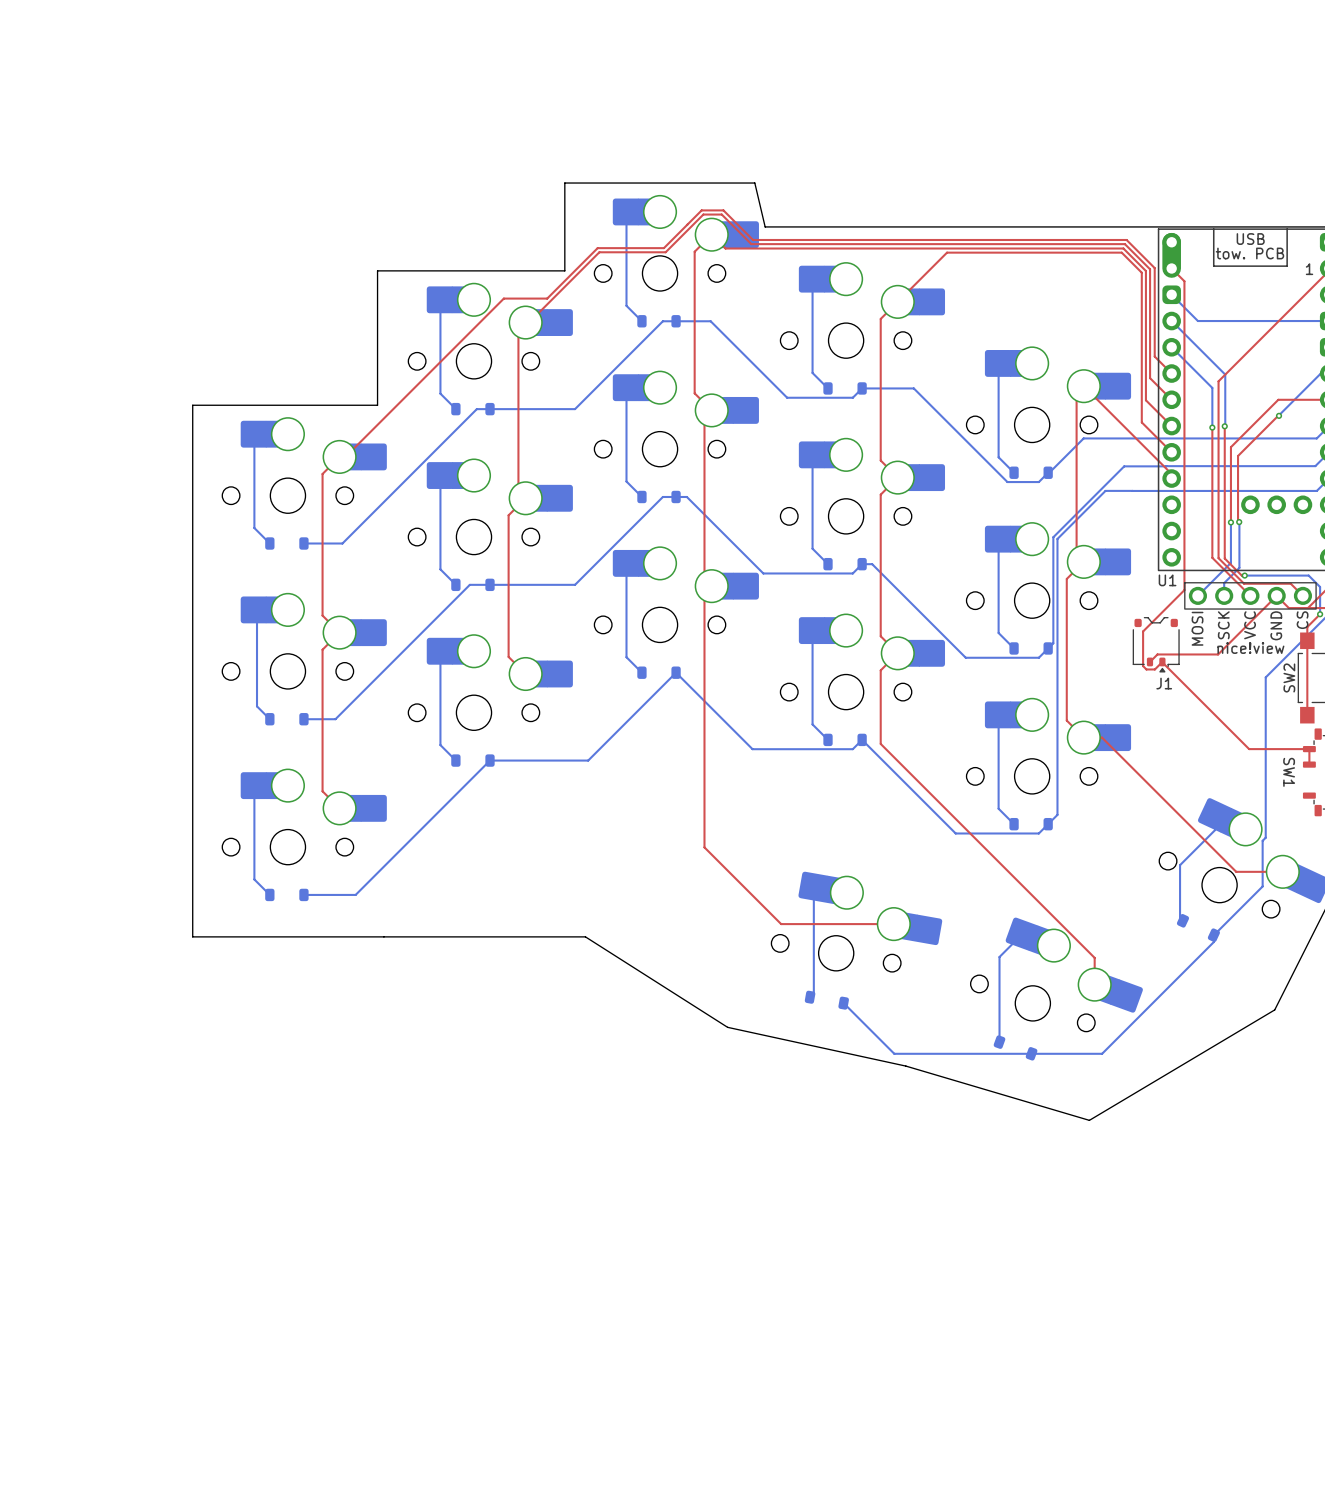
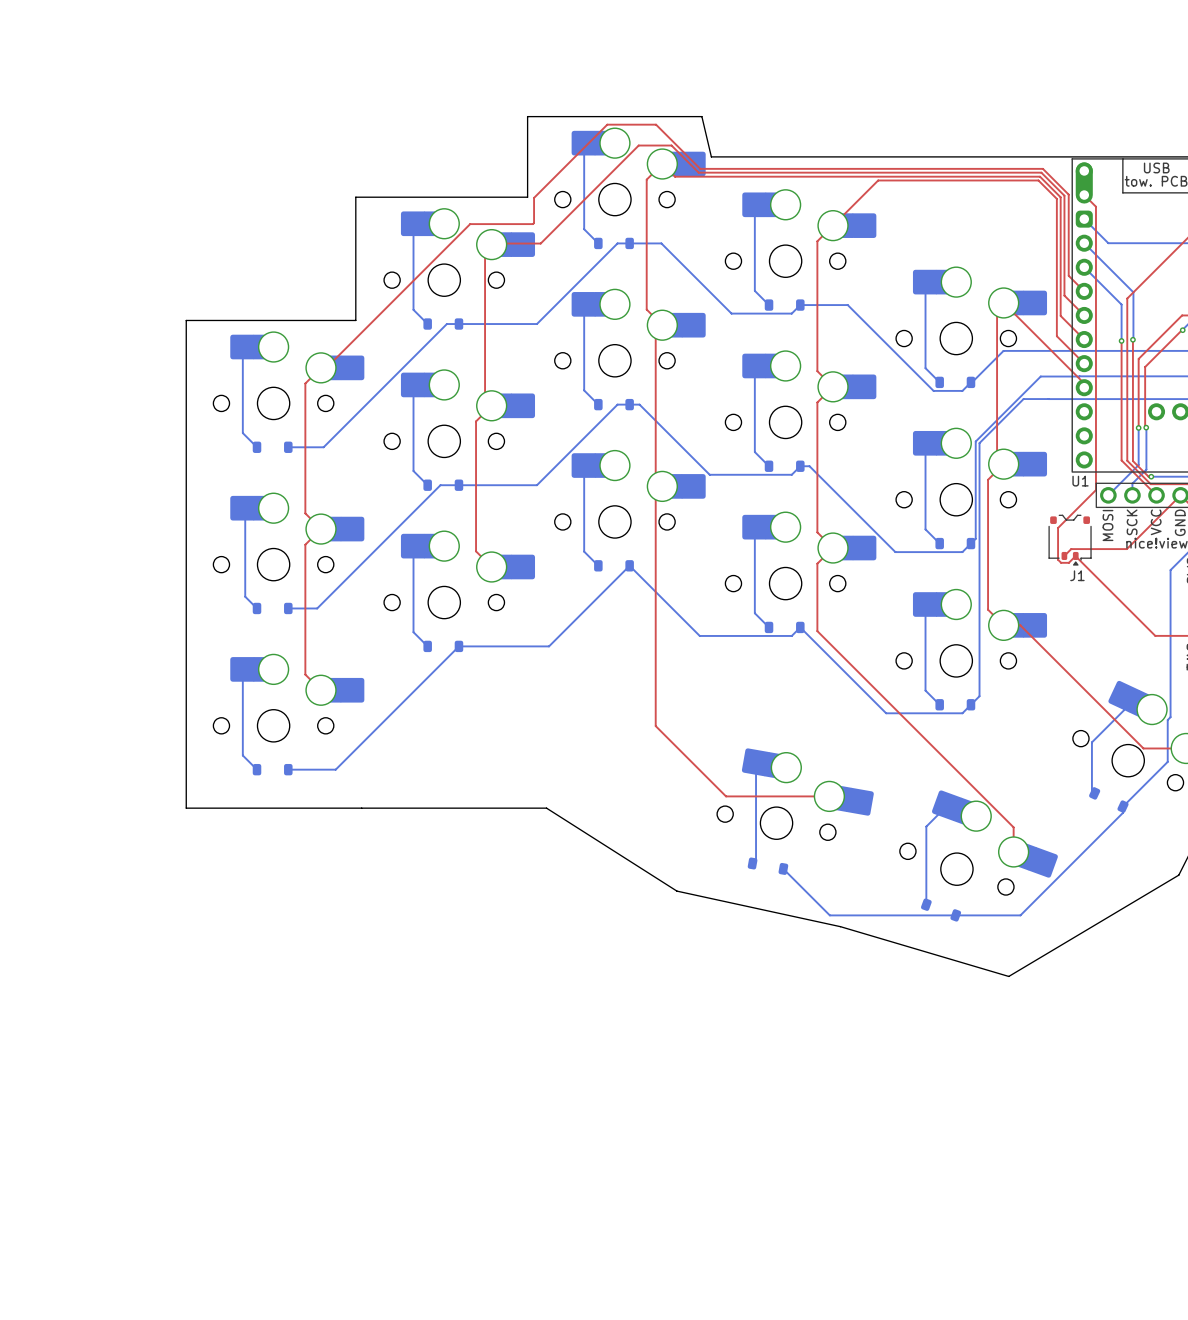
top track: (723, 210) (701, 210) (663, 248) (597, 248) (547, 298) (503, 298) (502, 300) -> (673, 141) (656, 124) (607, 124) (534, 197) (533, 224) (470, 224)
top track: (703, 214) (665, 252) (599, 252) (529, 322) -> (654, 145) (638, 145) (540, 243) (494, 244)

